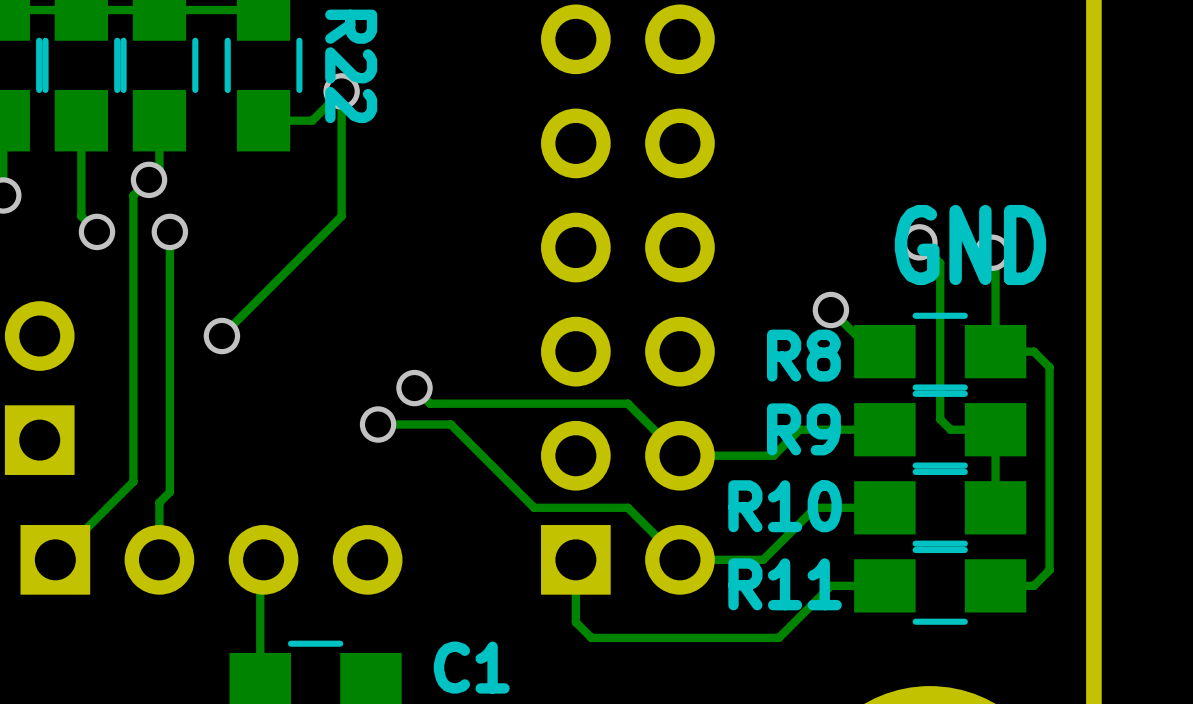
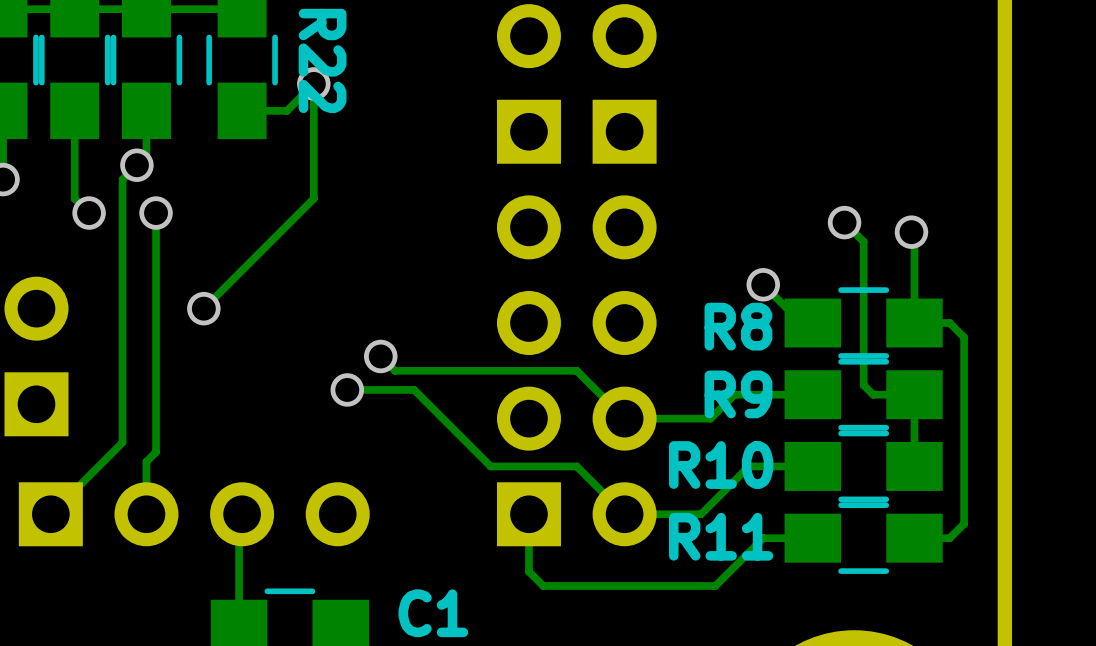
part: none -> (528, 83)
part: none -> (624, 83)
text: GND (970, 245) -> none
part: (627, 299) -> none

